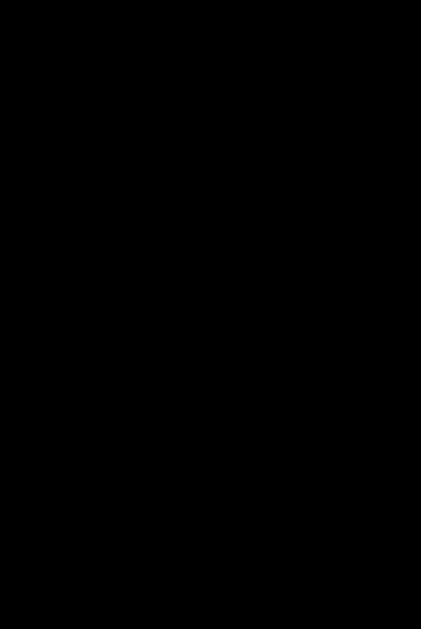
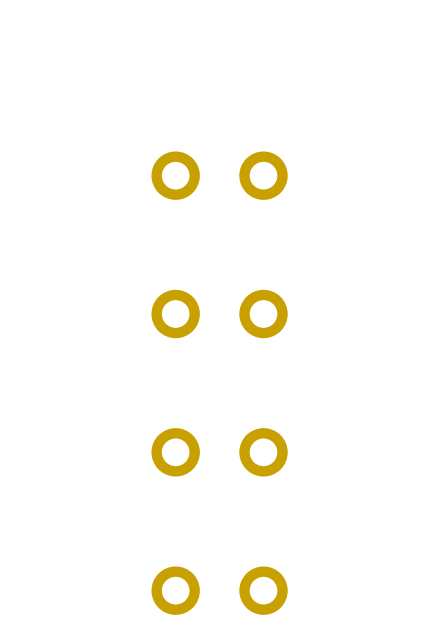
part: none -> (219, 175)
part: none -> (219, 314)
part: none -> (219, 452)
part: none -> (219, 590)

